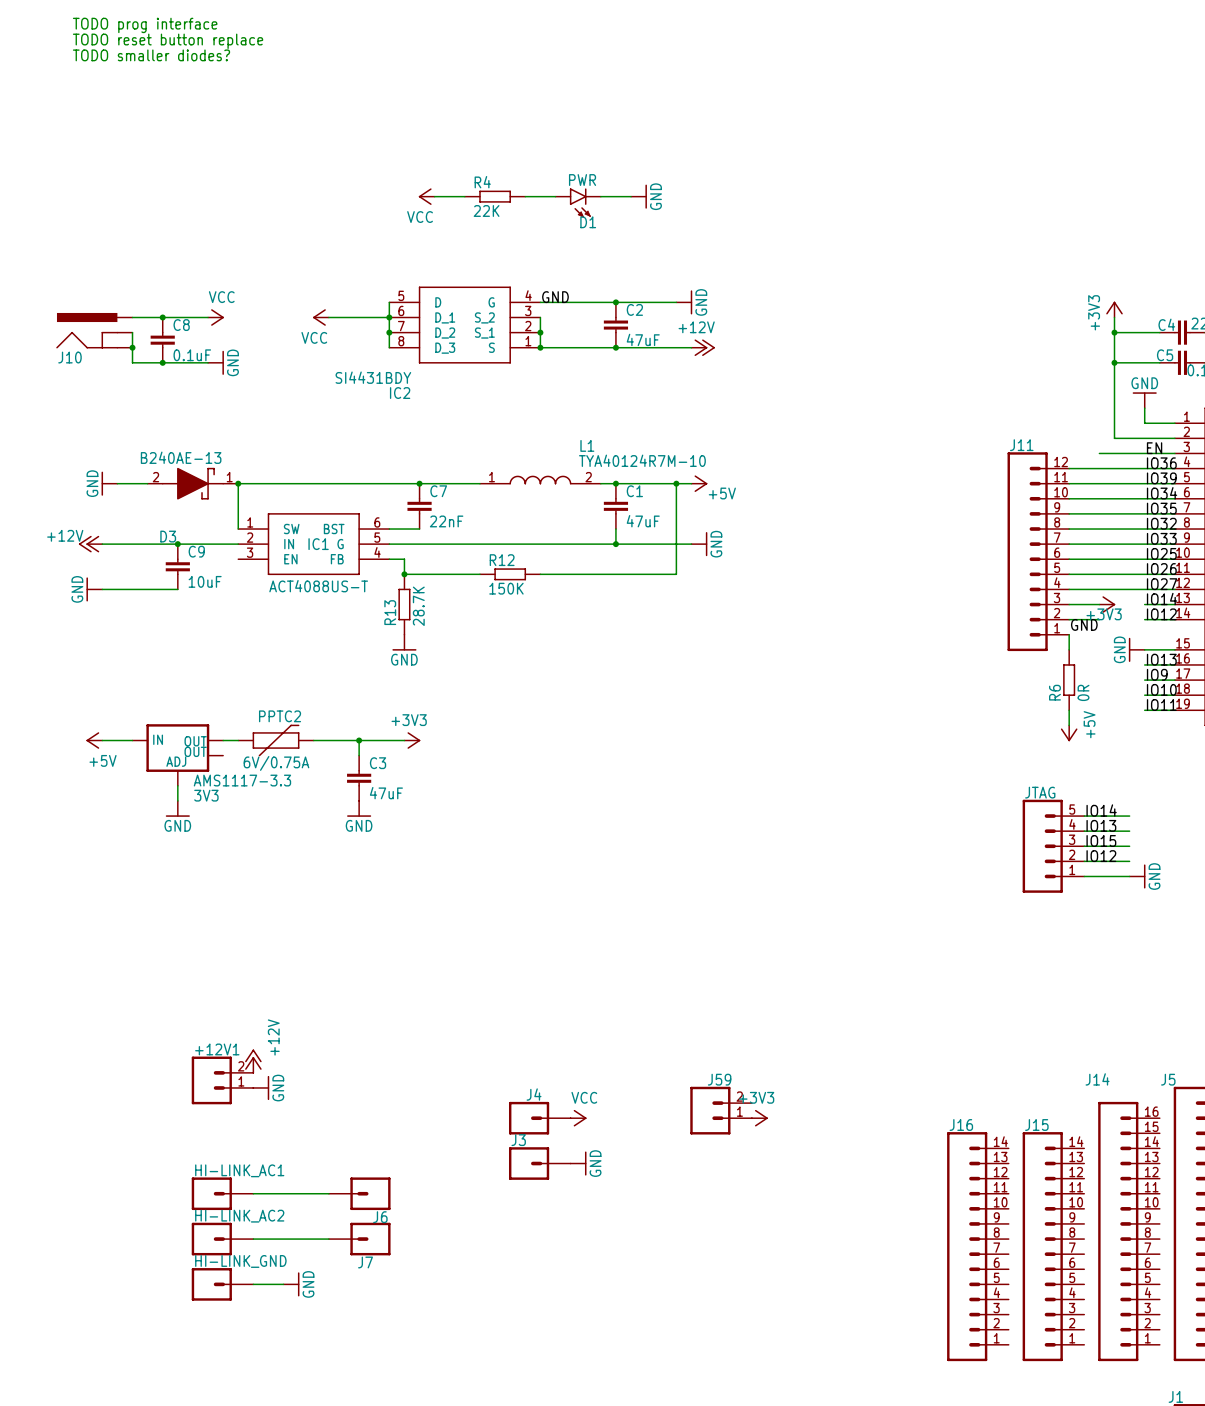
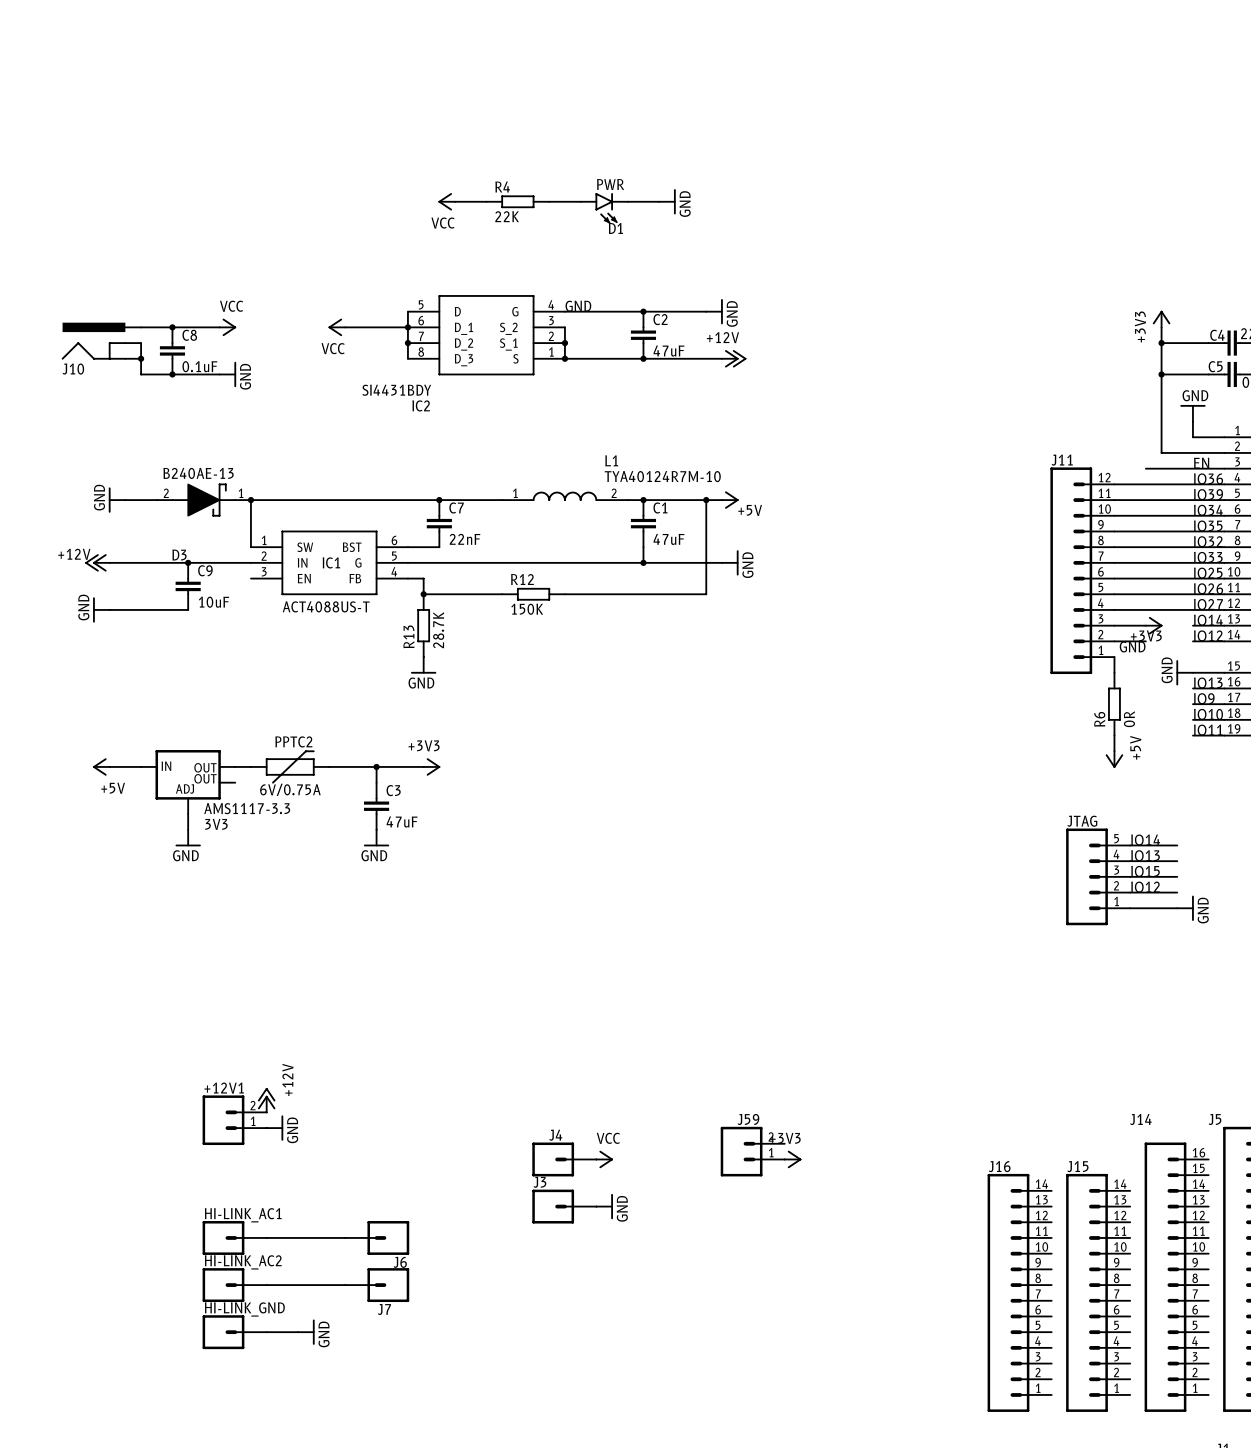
text: TODO prog interface (145, 25) -> none
text: TODO reset button replace (168, 41) -> none
text: TODO smaller diodes? (151, 55) -> none

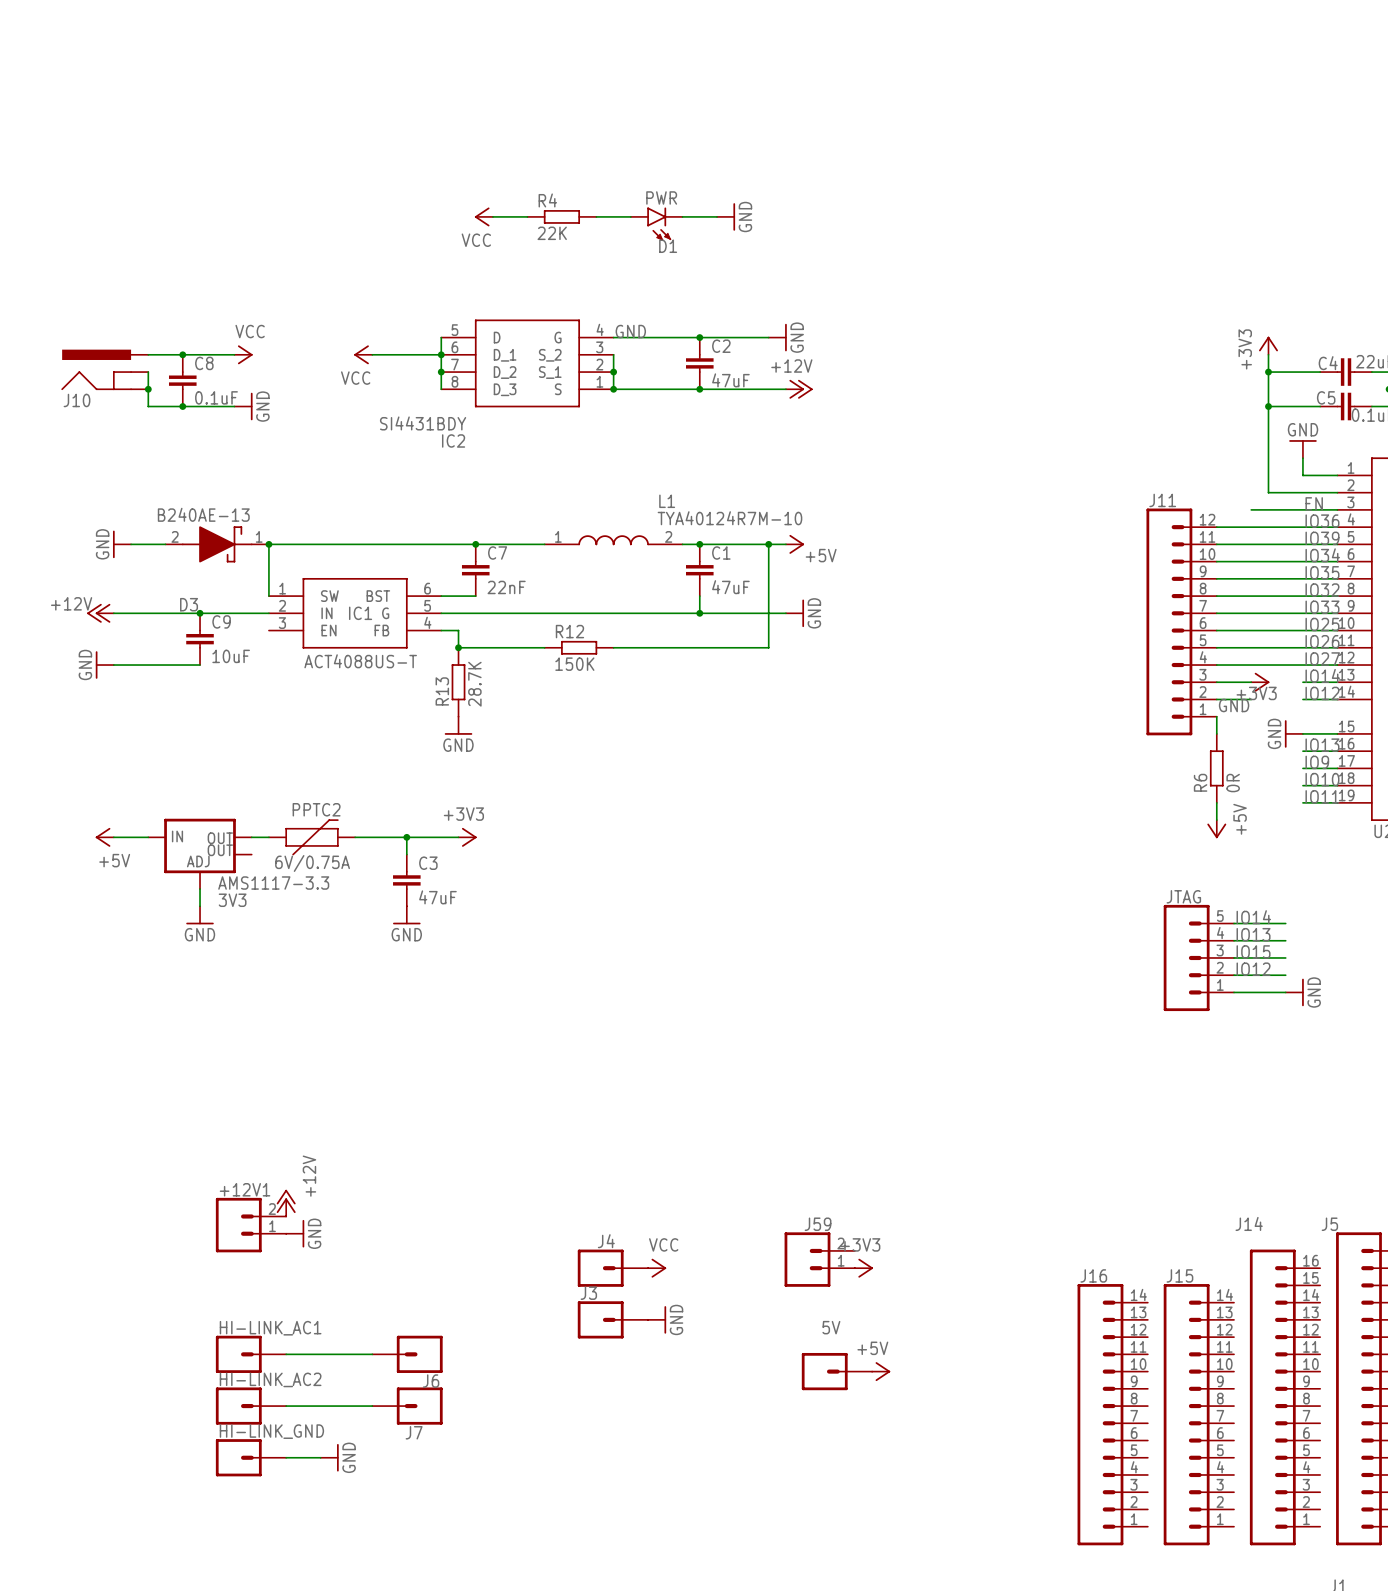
5V: none -> (836, 1371)
power symbol: none -> +5V (881, 1371)

